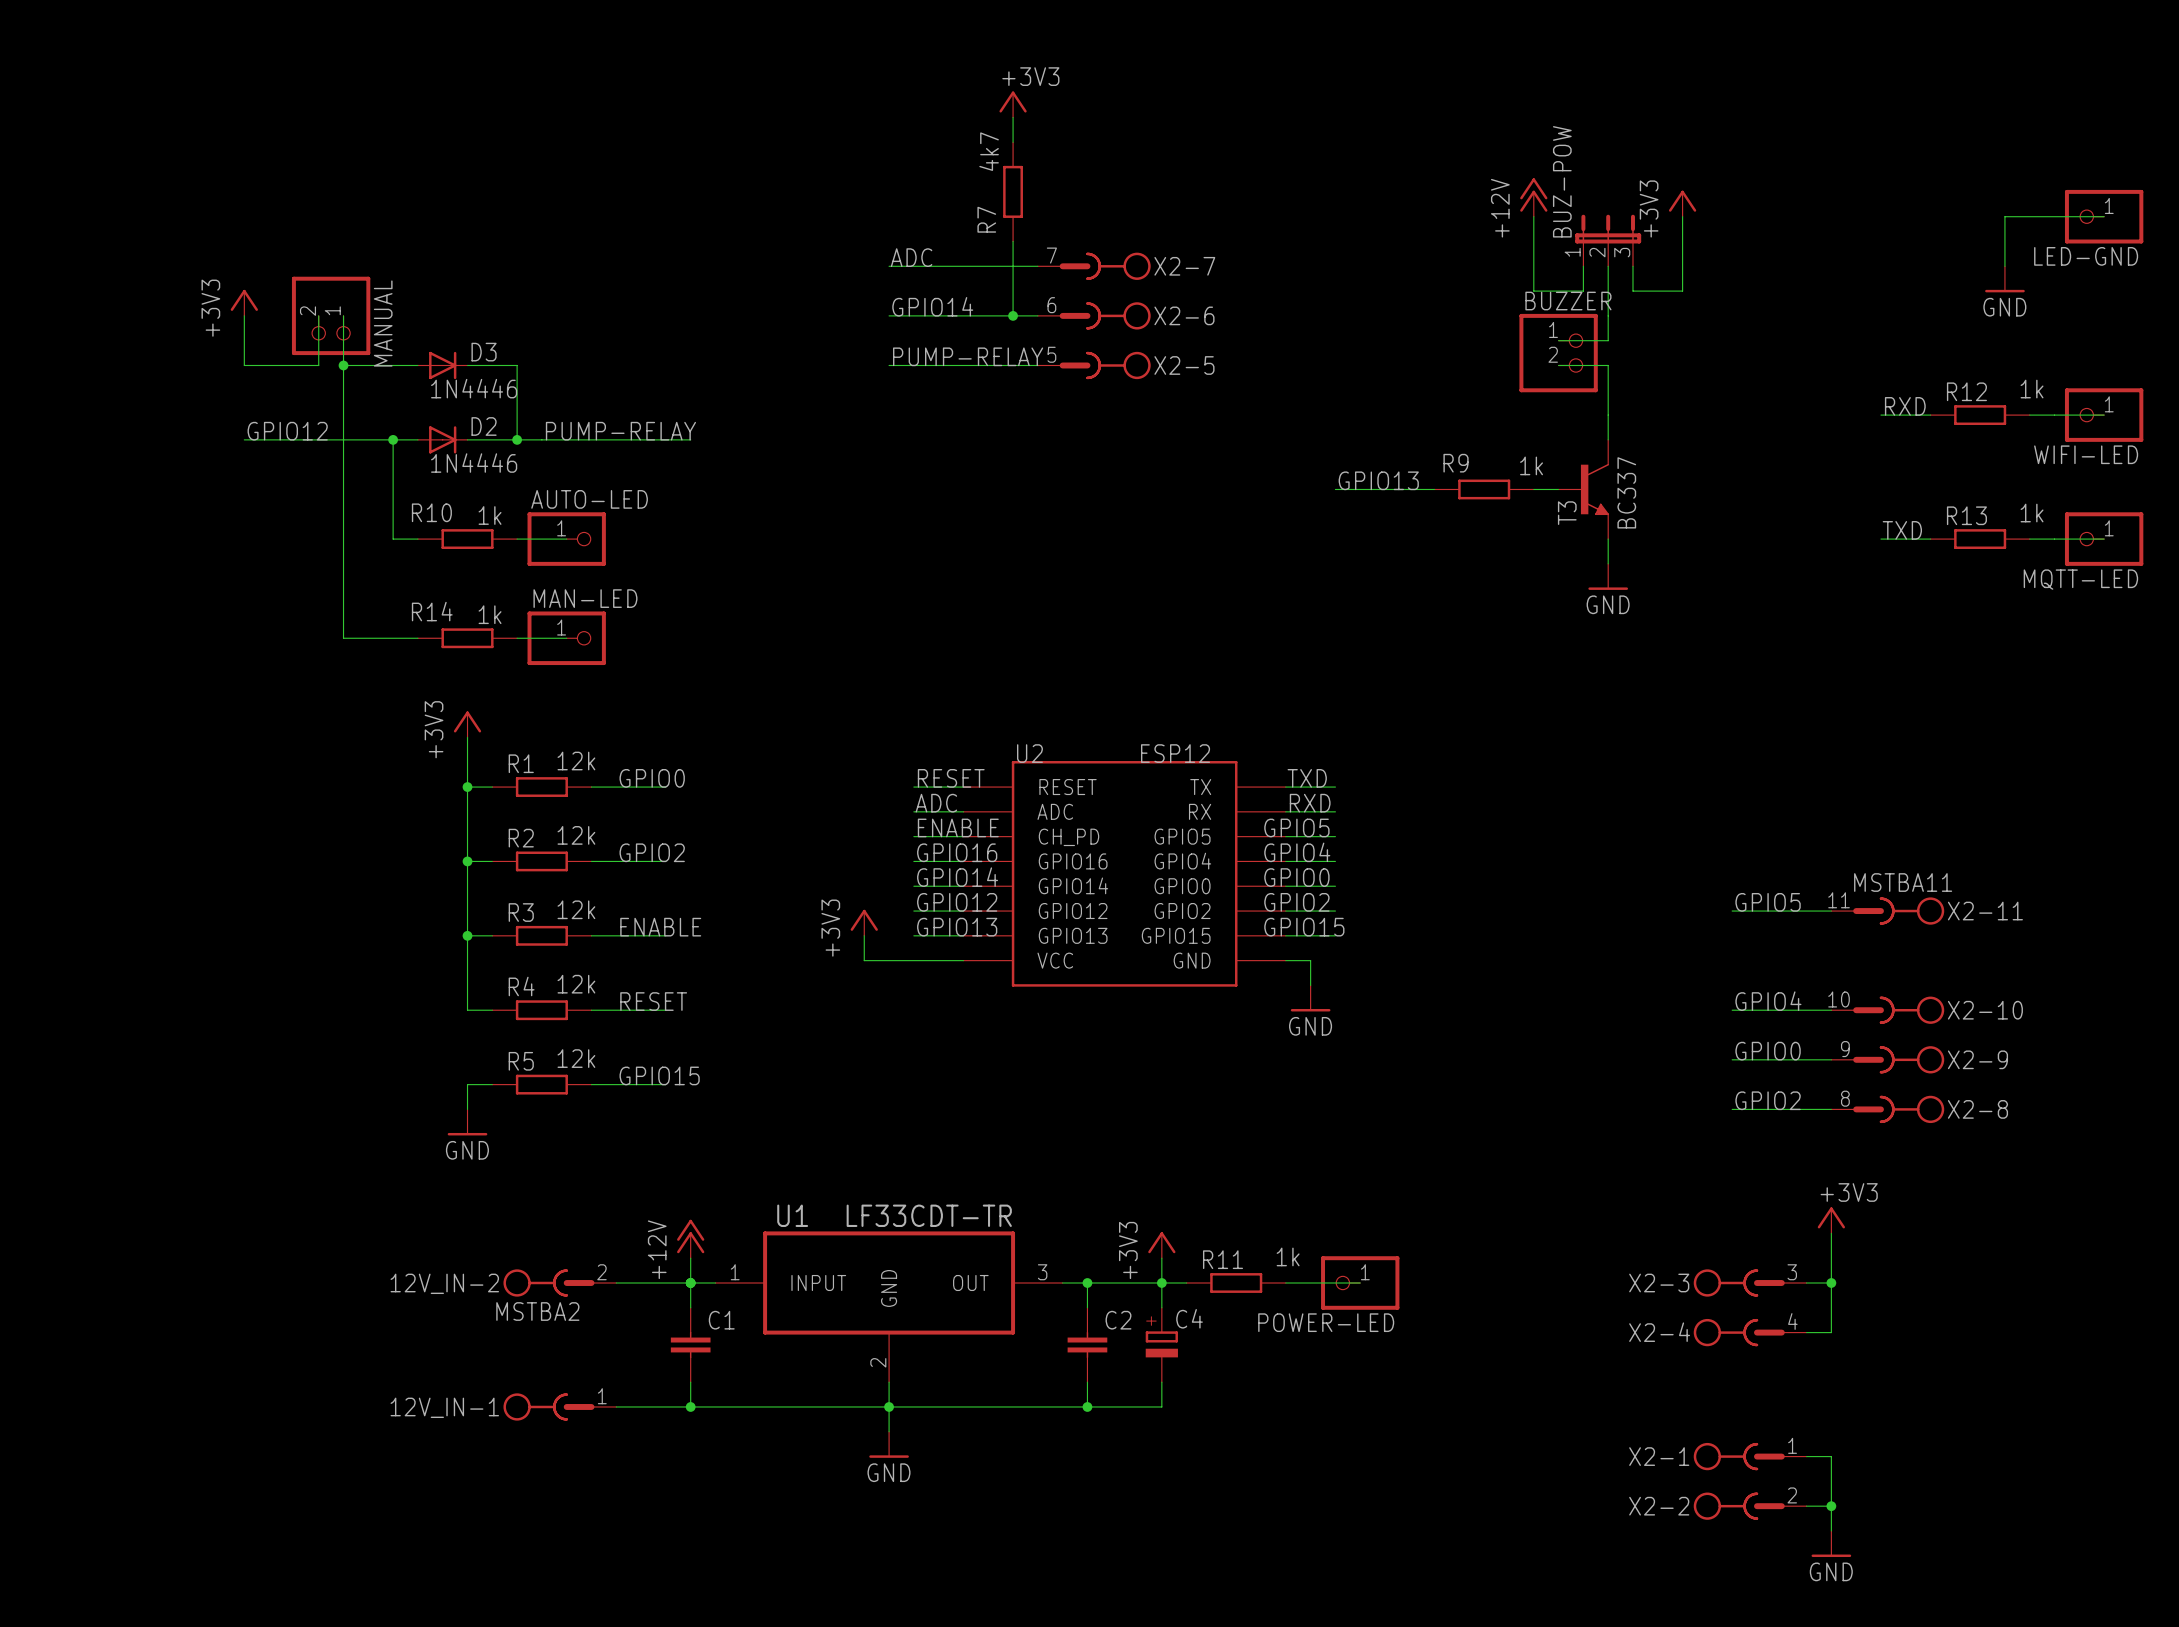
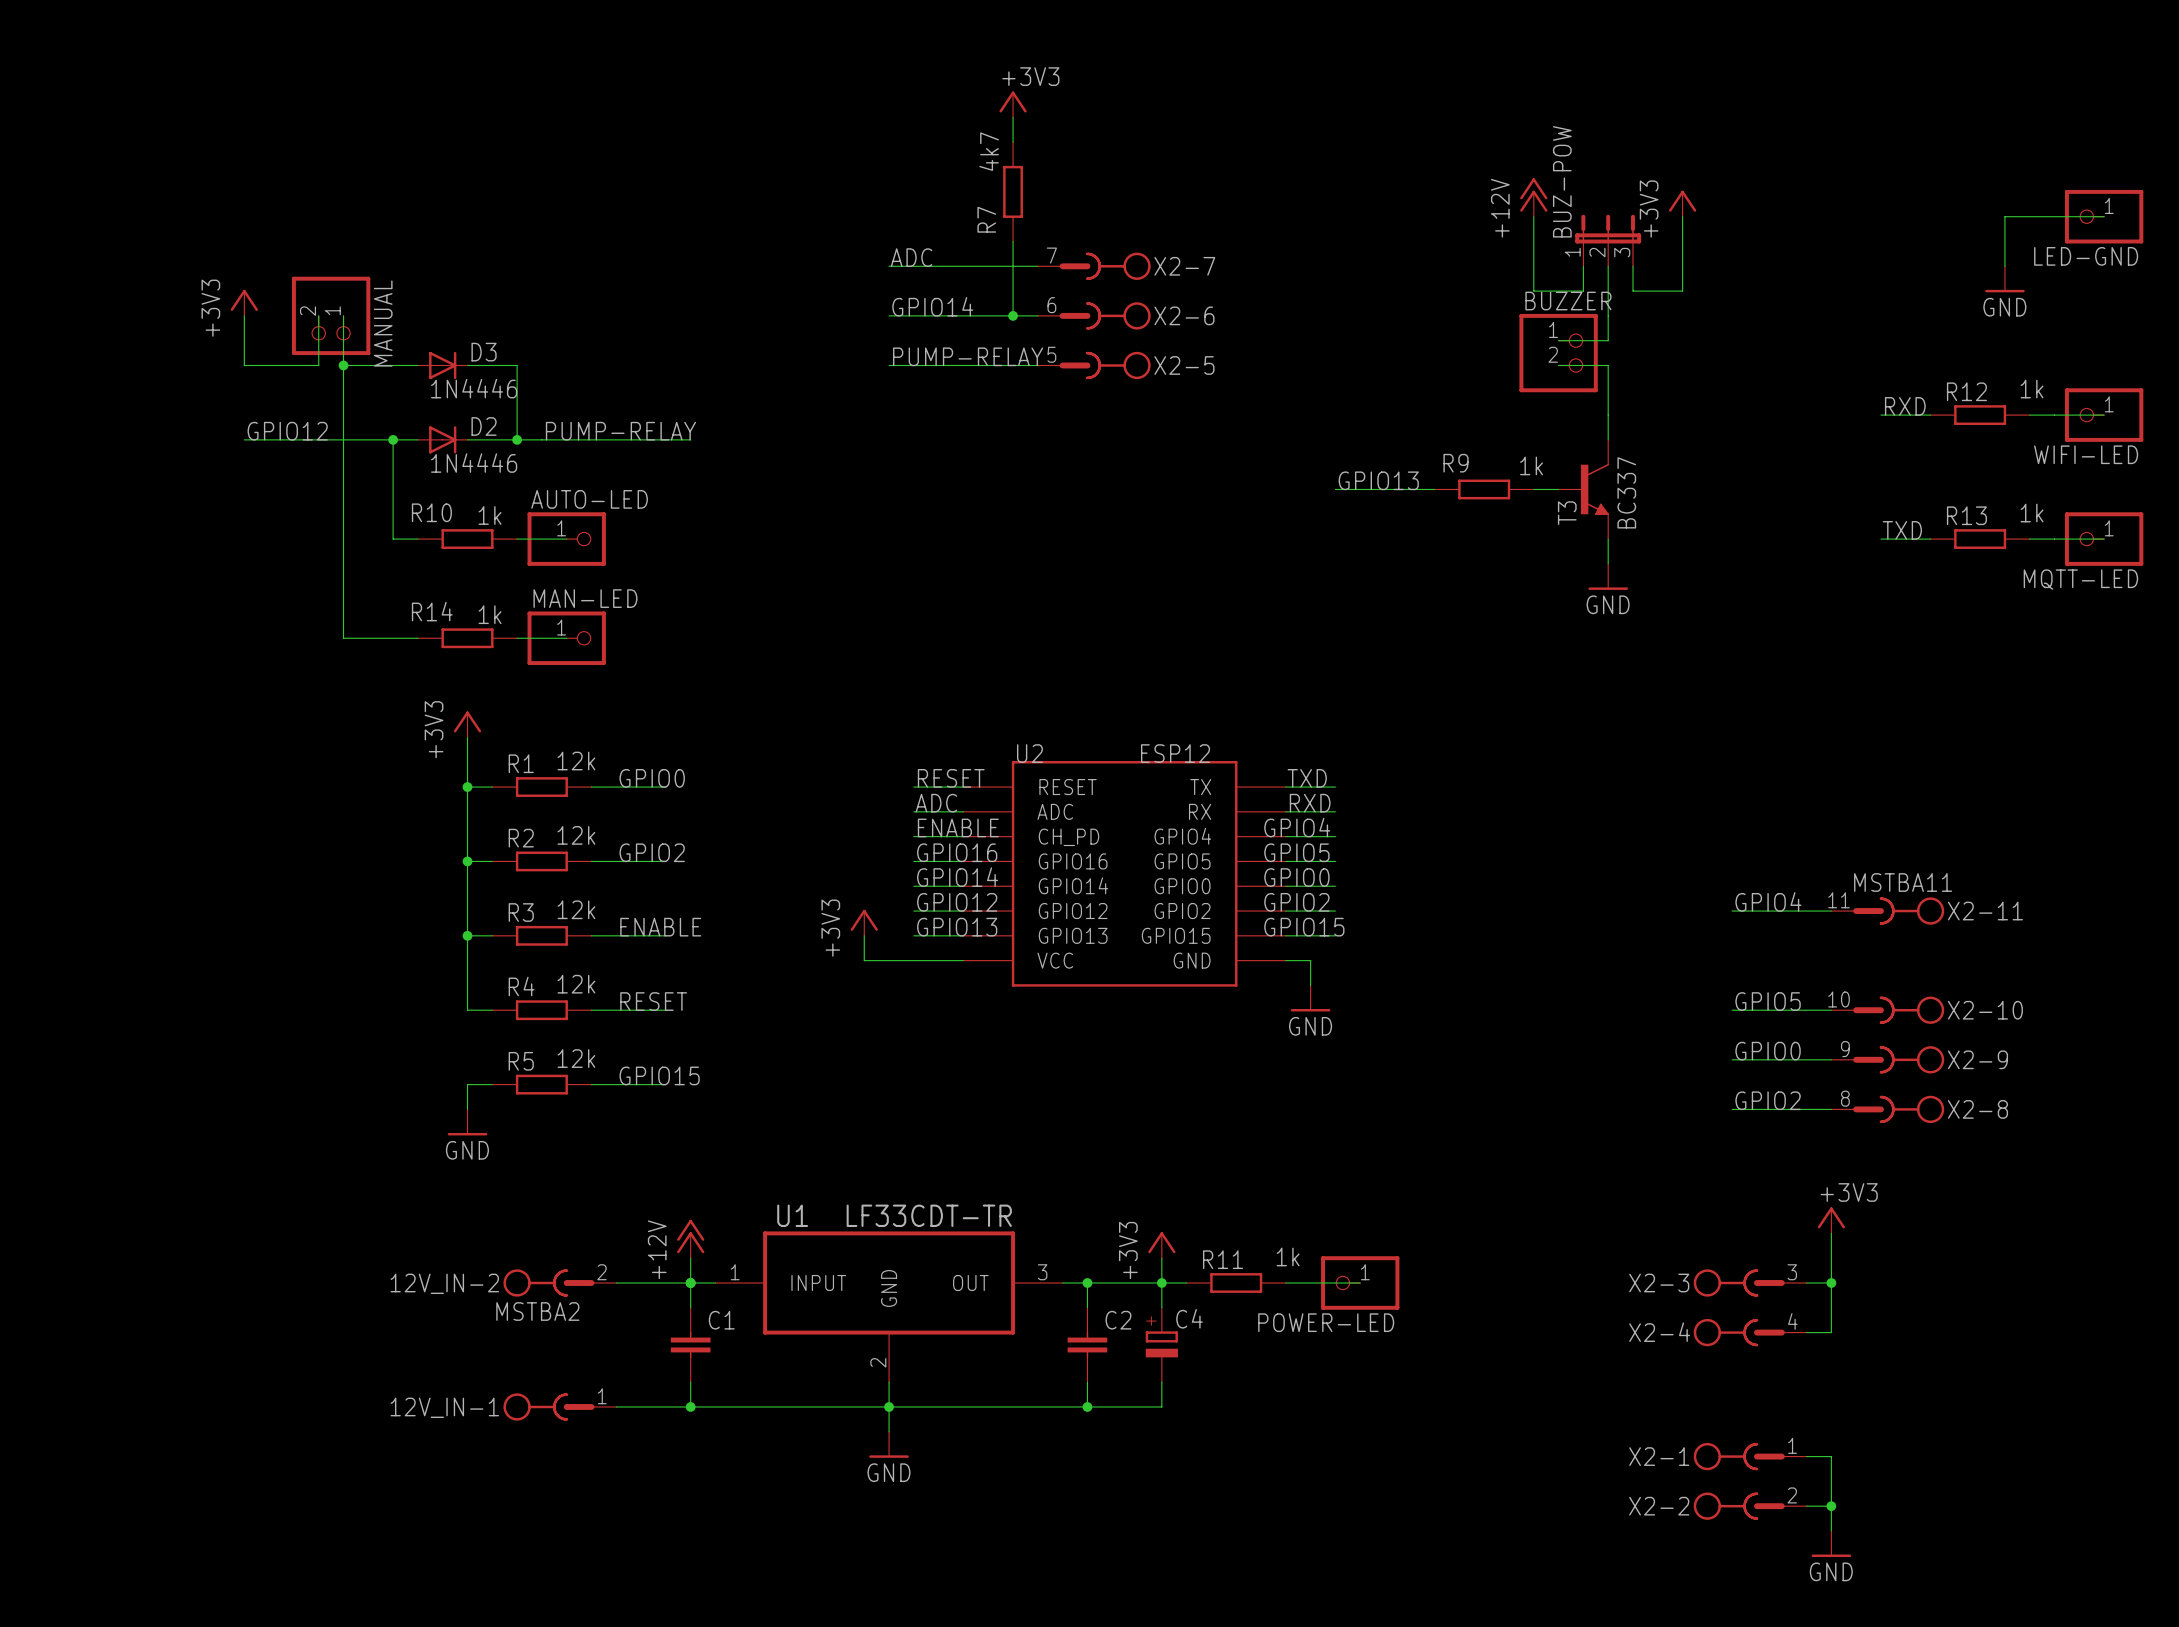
label: GPIO5 (1296, 827) -> GPIO4 (1297, 827)
U2 pin name: GPIO5 (1182, 836) -> GPIO4 (1182, 836)
label: GPIO4 (1297, 852) -> GPIO5 (1296, 852)
U2 pin name: GPIO4 (1182, 861) -> GPIO5 (1182, 861)
label: GPIO5 (1768, 902) -> GPIO4 (1768, 901)
label: GPIO4 (1768, 1001) -> GPIO5 (1768, 1001)

